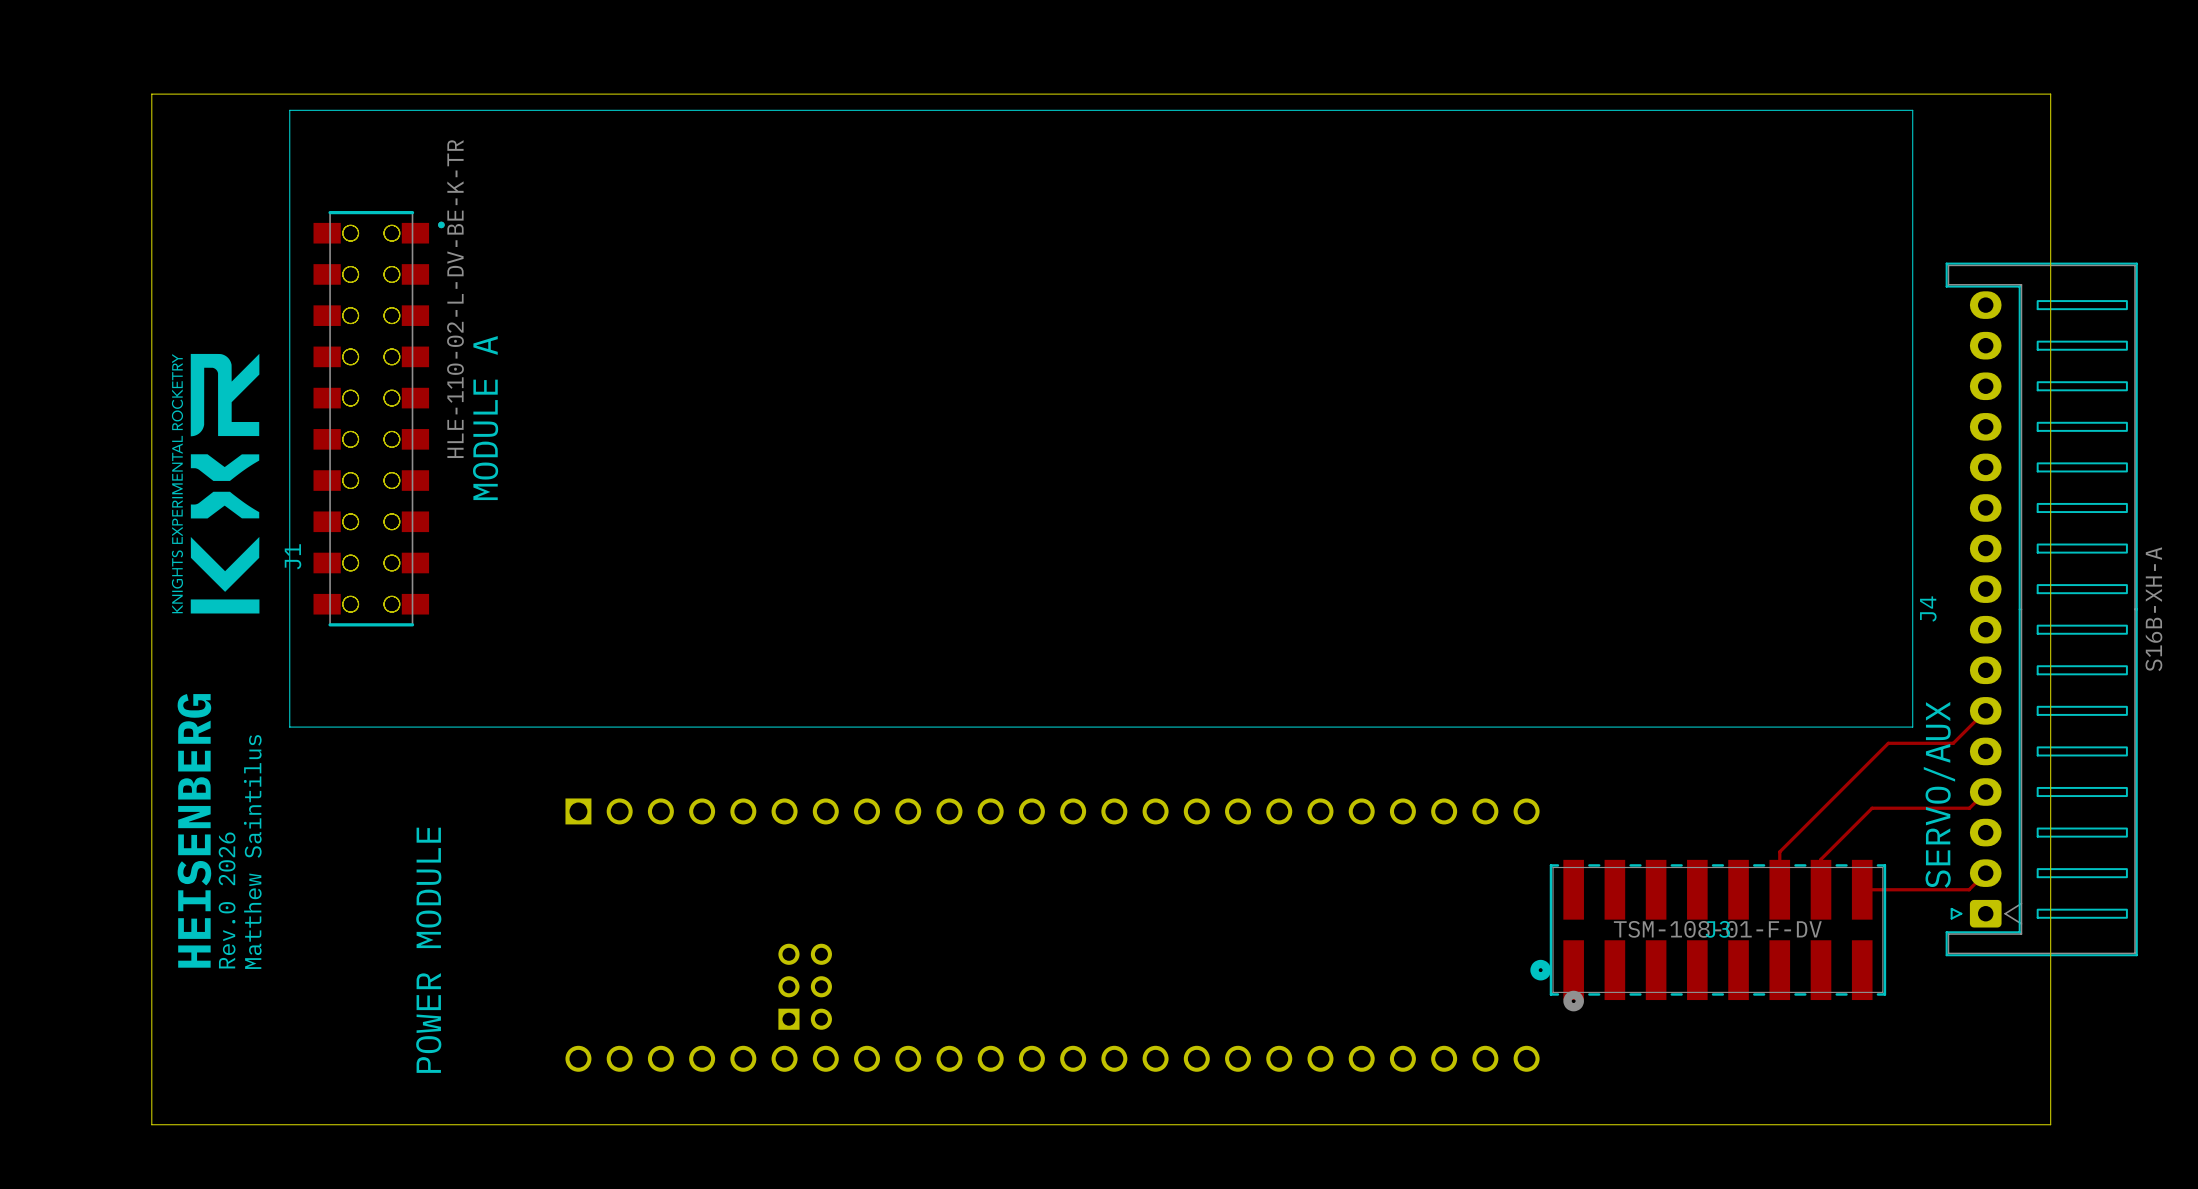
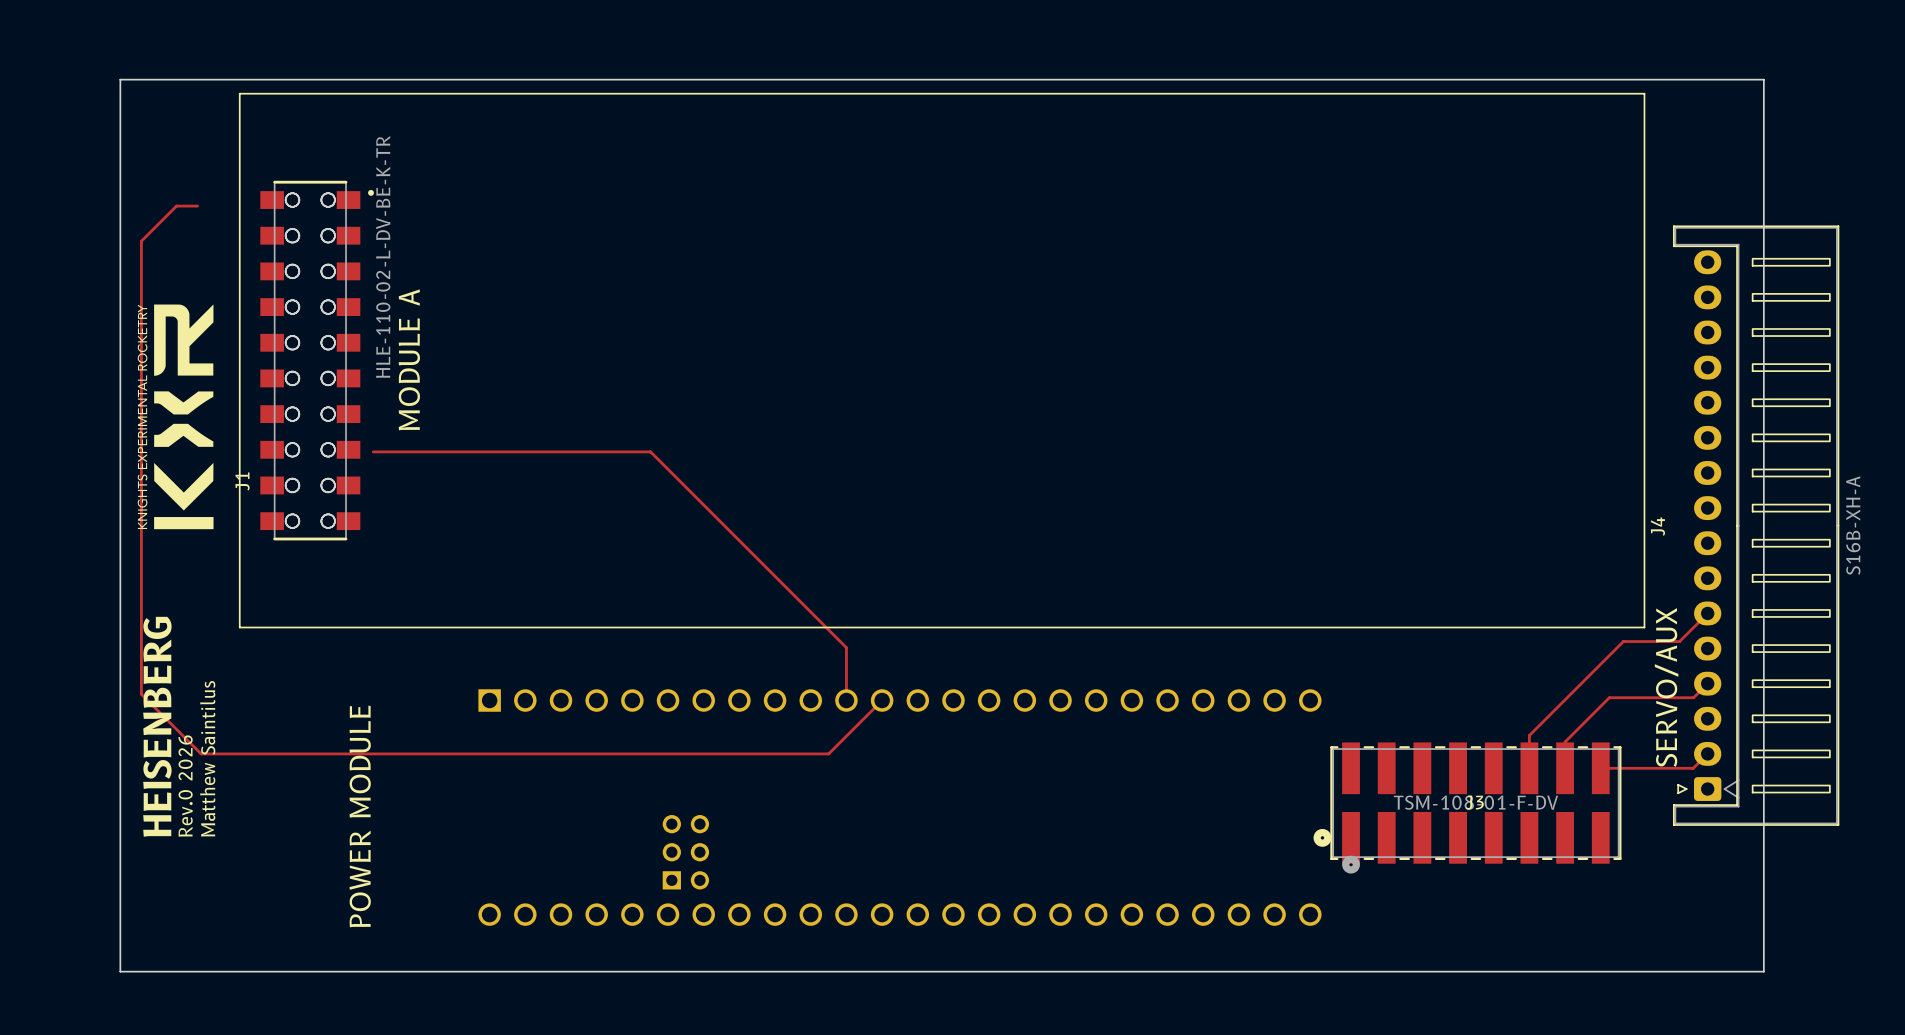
track: none -> (197, 206) (176, 206) (141, 241) (141, 694) (201, 753) (828, 753) (882, 700)
track: none -> (373, 451) (650, 451) (846, 647) (846, 700)

